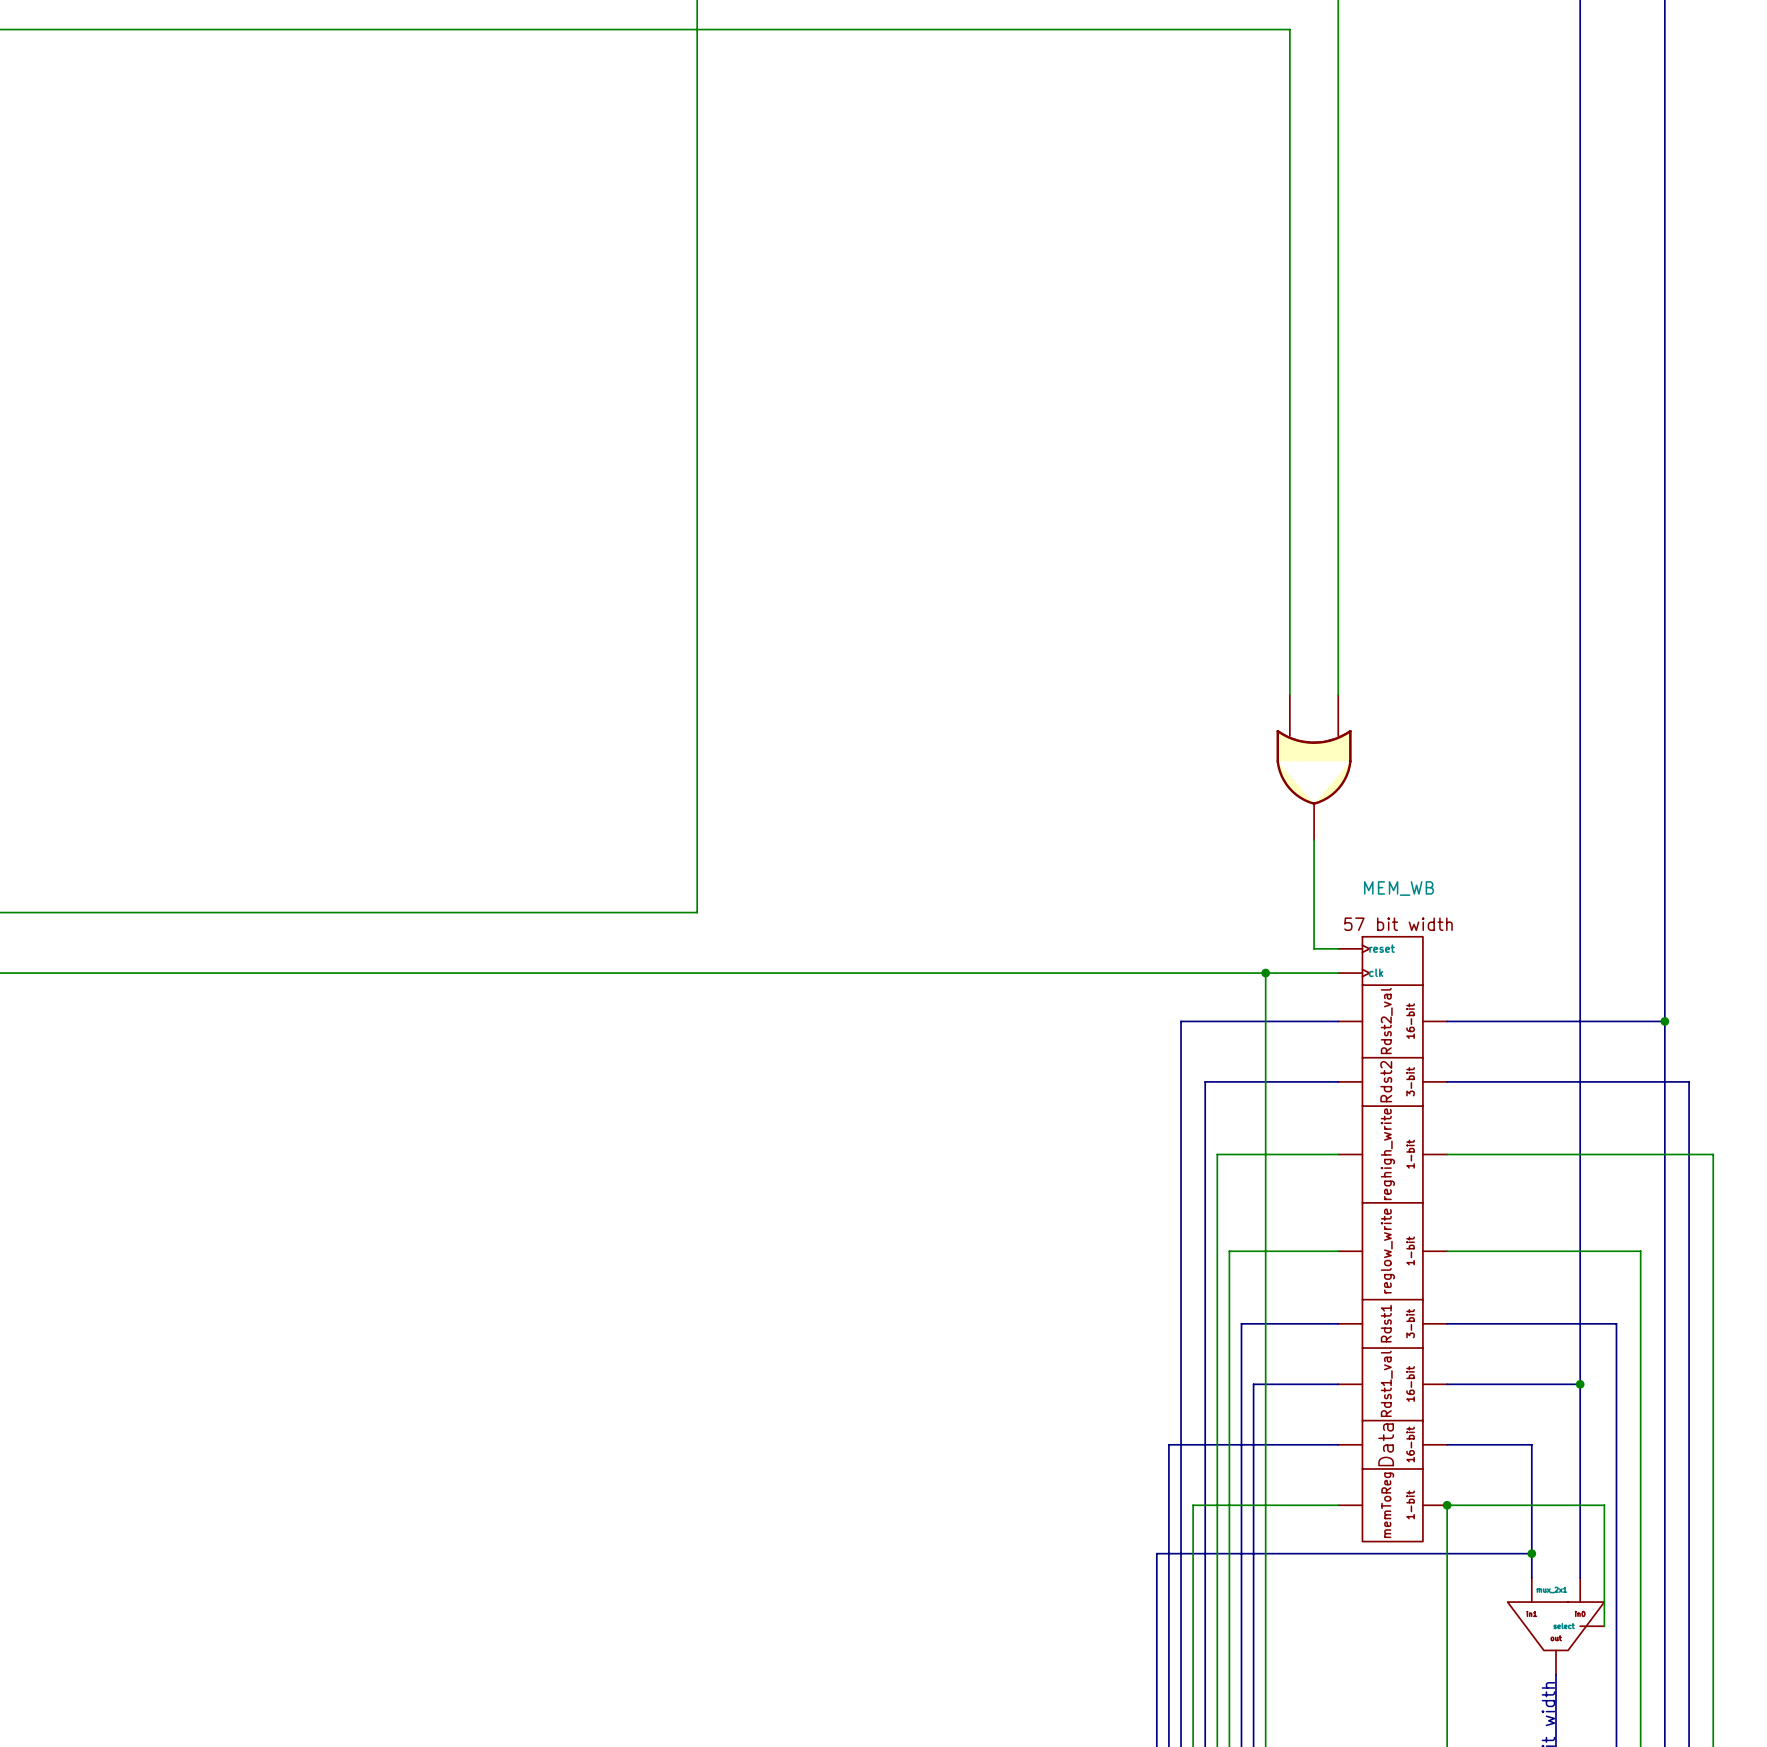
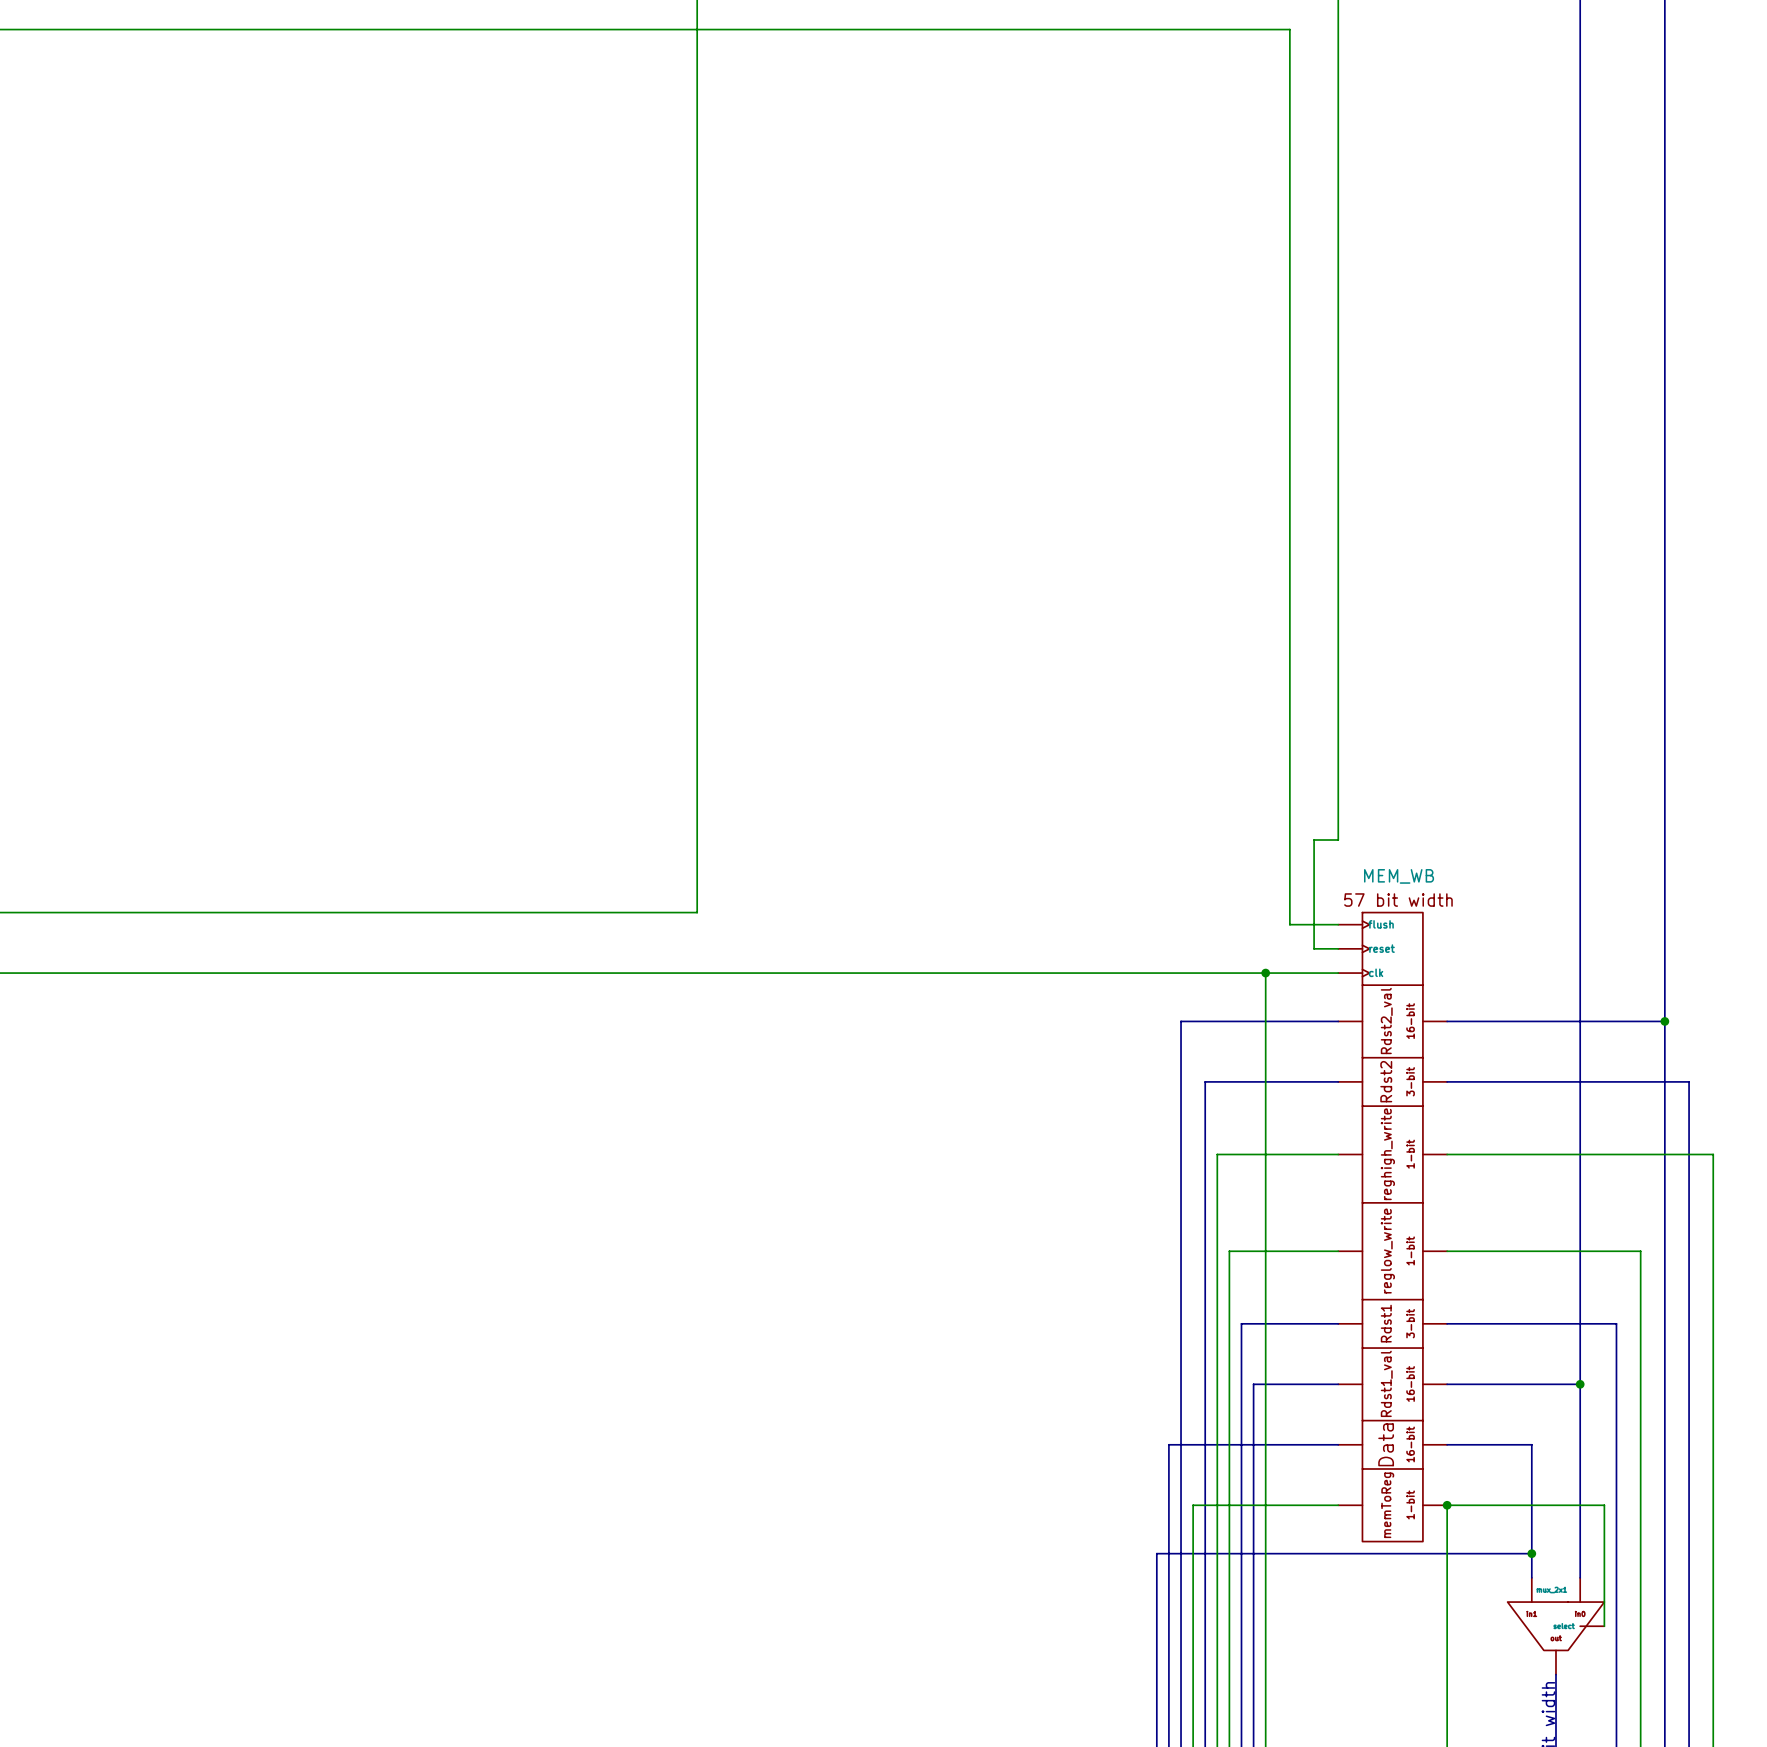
wire: none -> (1289, 694) (1289, 924) (1338, 924)
wire: none -> (1338, 694) (1338, 839) (1314, 839)
part: (1314, 767) -> none
part: none -> MEM_WB (1392, 1227)
part: MEM_WB (1392, 1239) -> none

